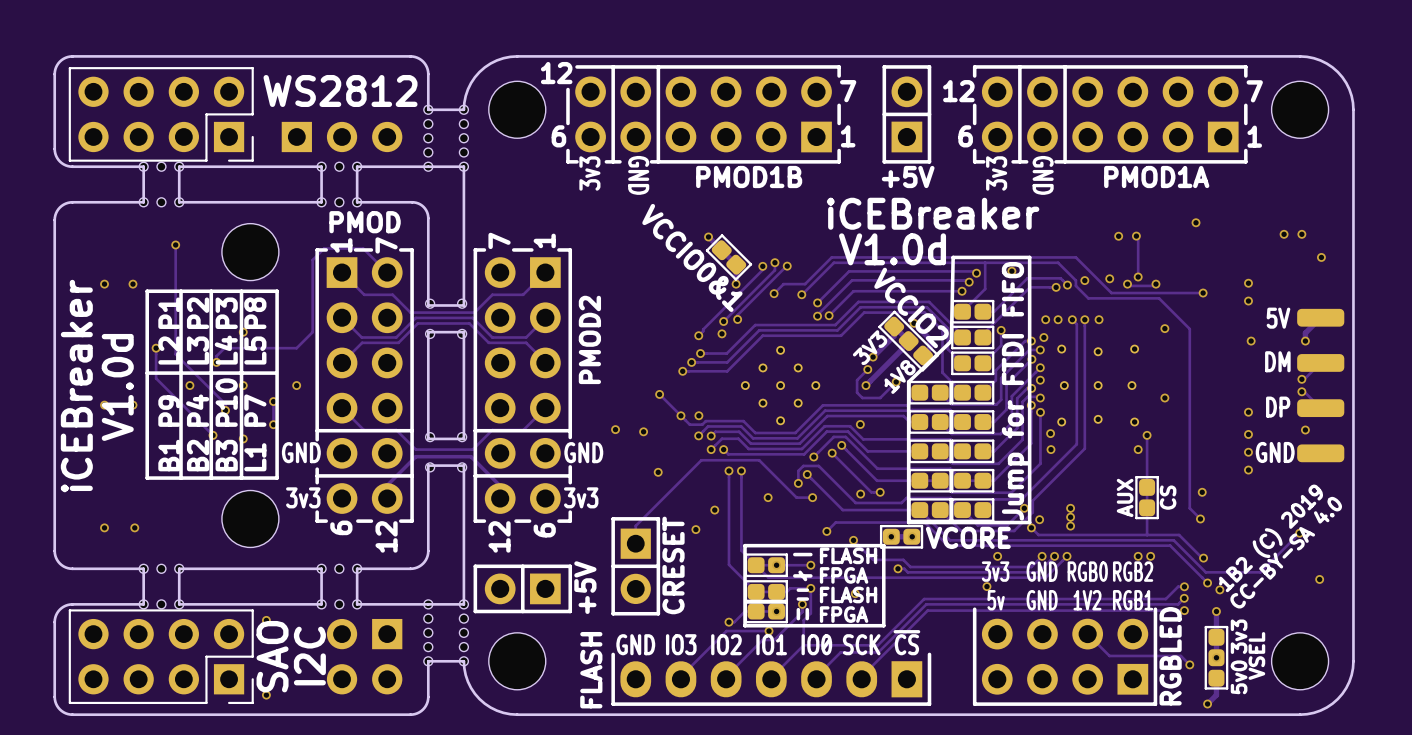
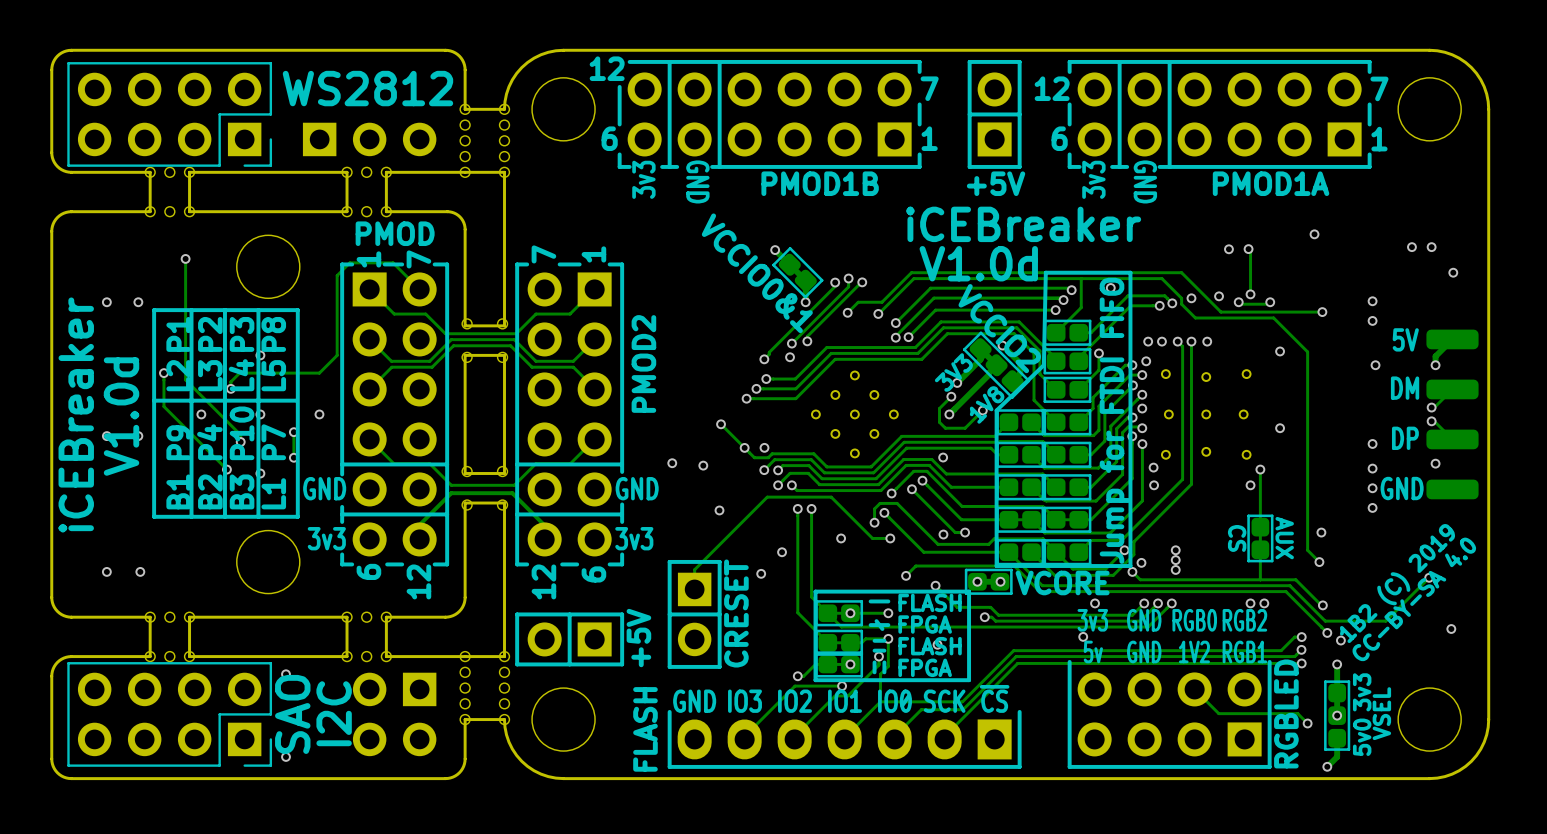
text: AUX (1125, 497) -> CS (1237, 538)
text: CS (1168, 497) -> AUX (1284, 538)

